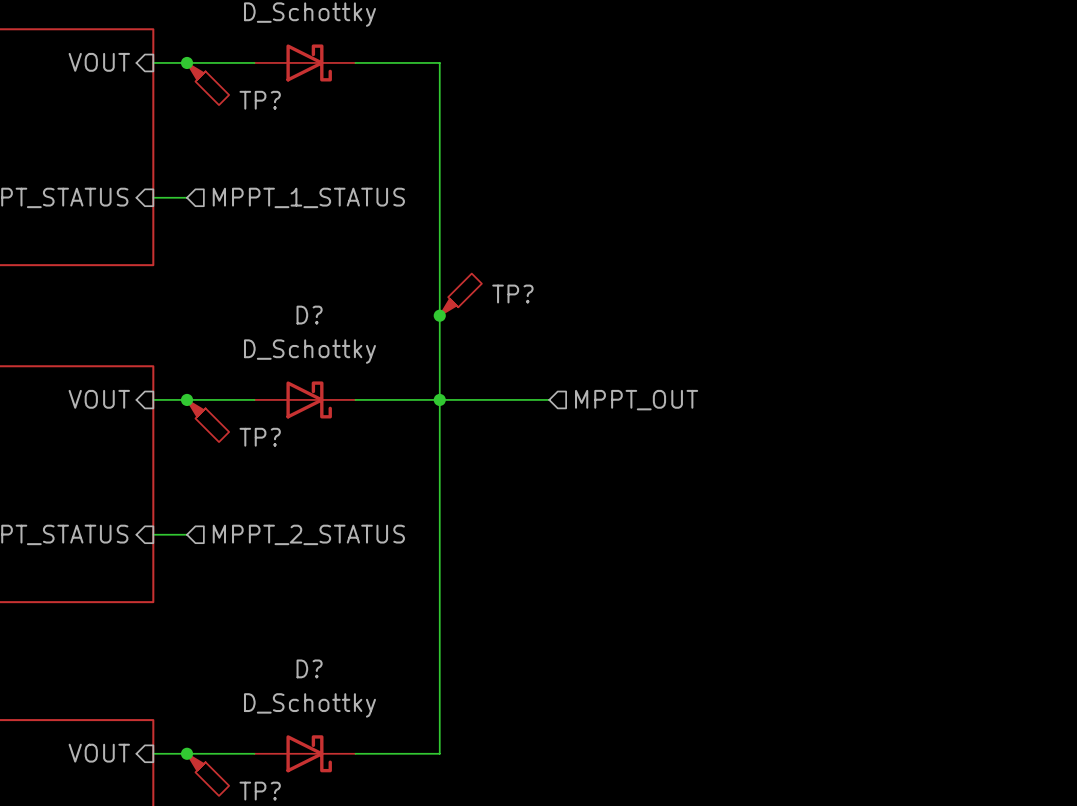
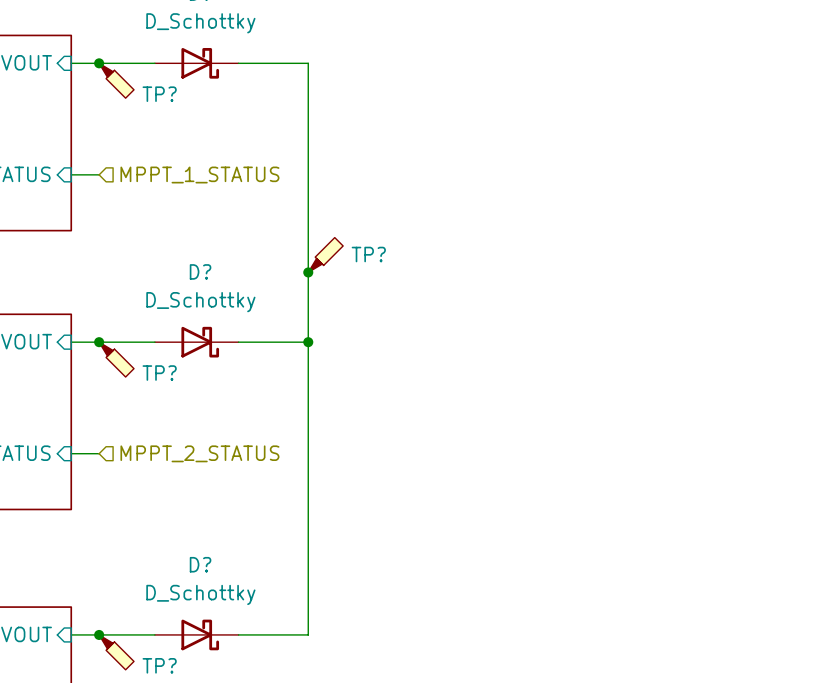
wire: (439, 399) (549, 399) -> none
hierarchical label: MPPT_OUT (636, 400) -> none

